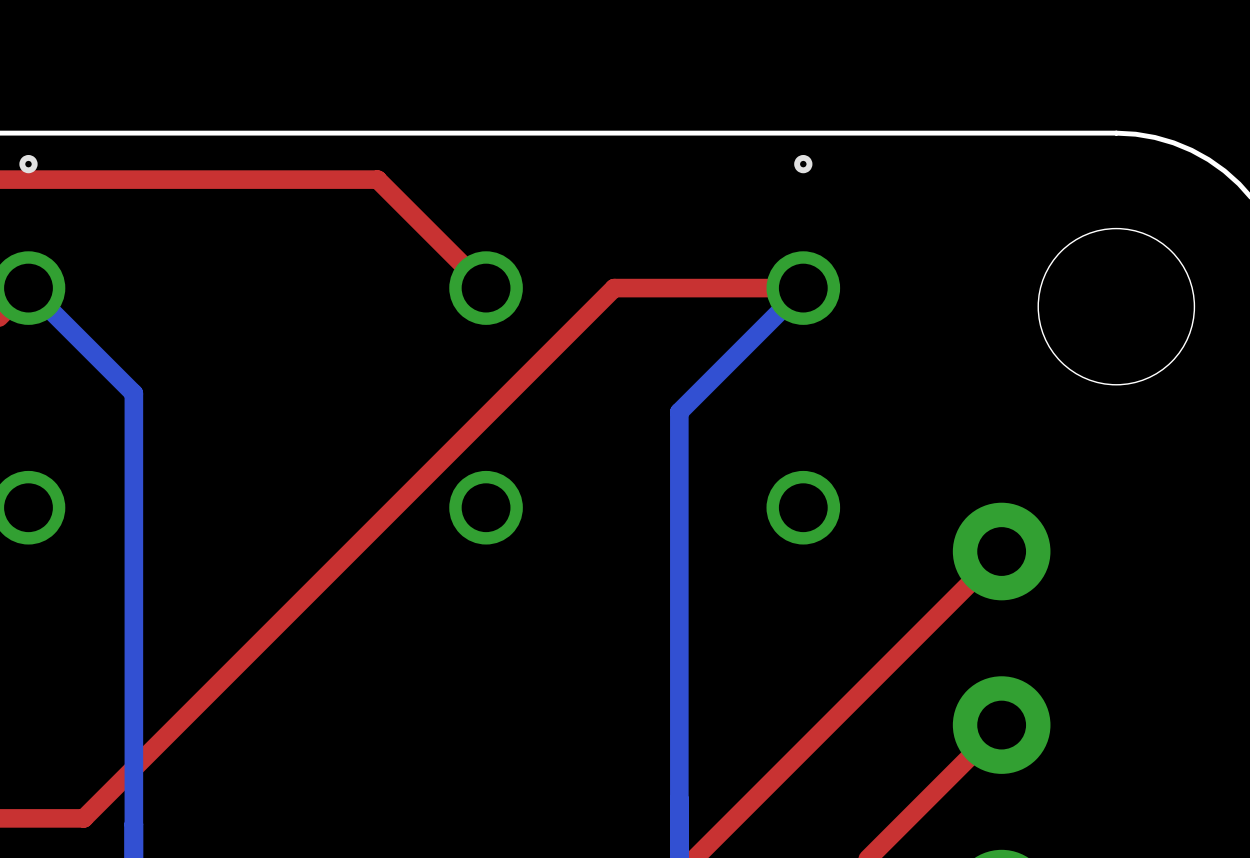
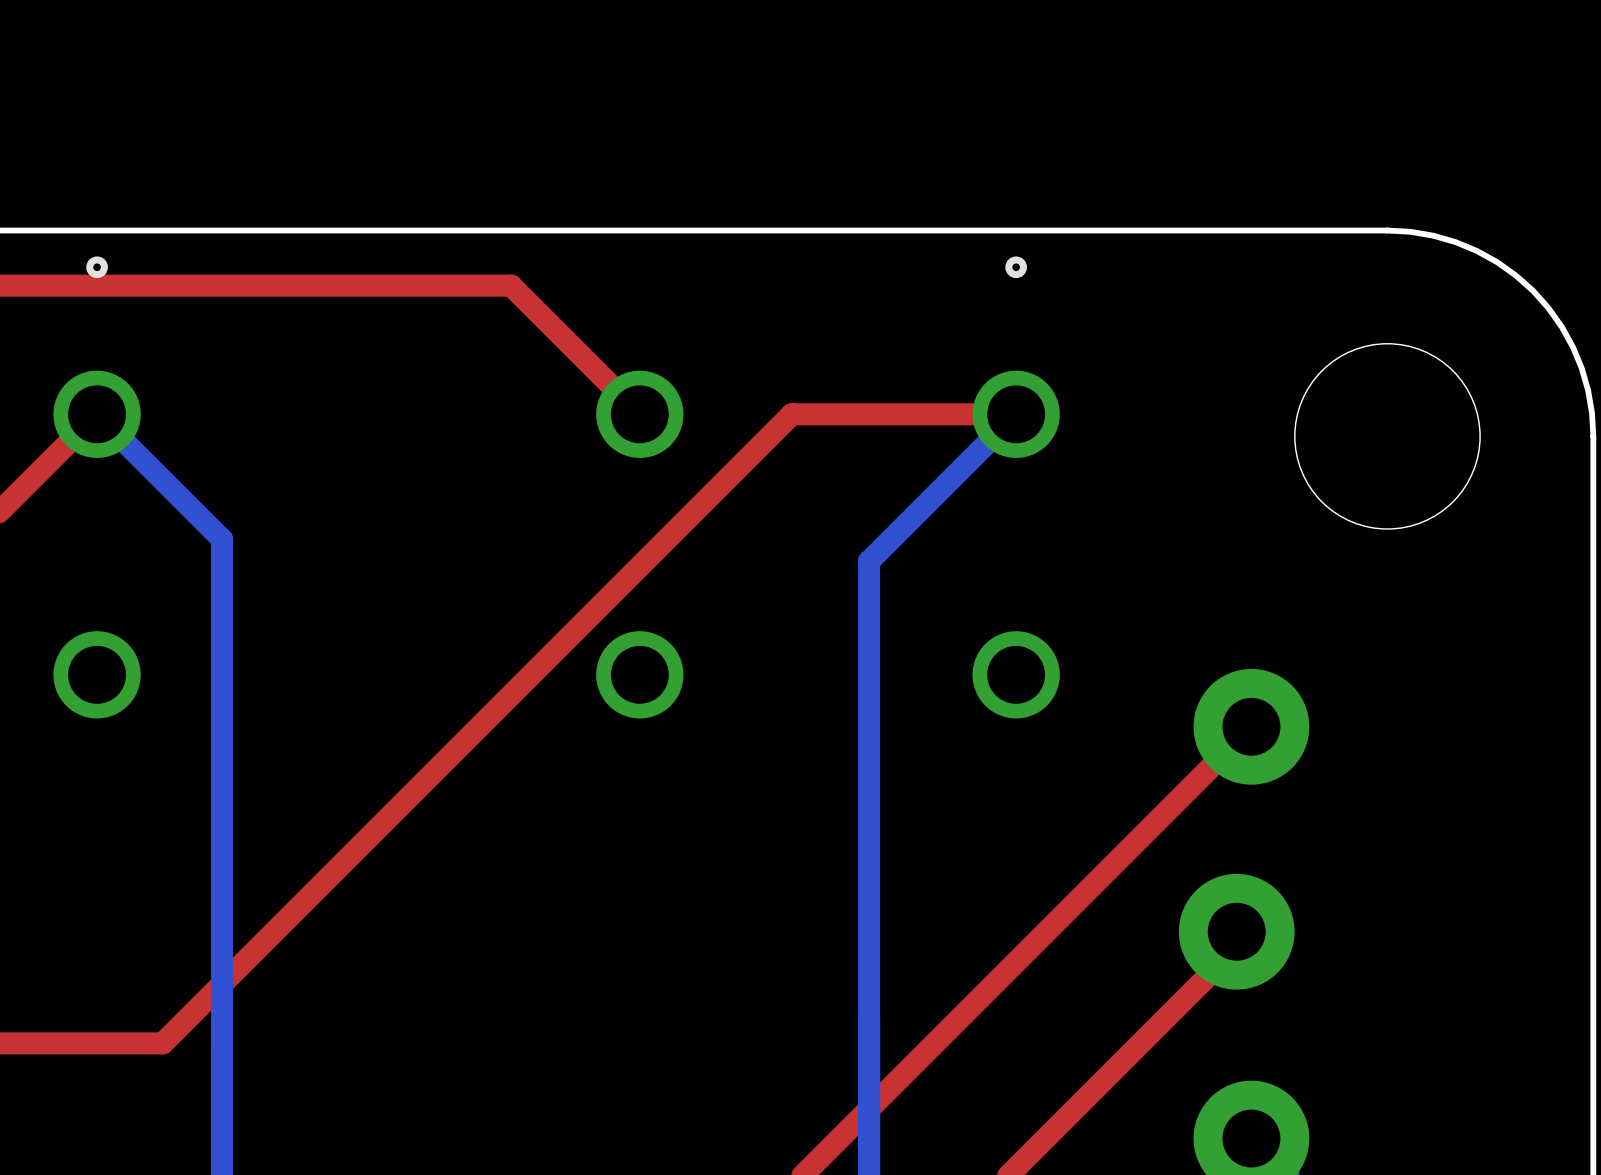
part position: (1001, 725) -> (1236, 931)

